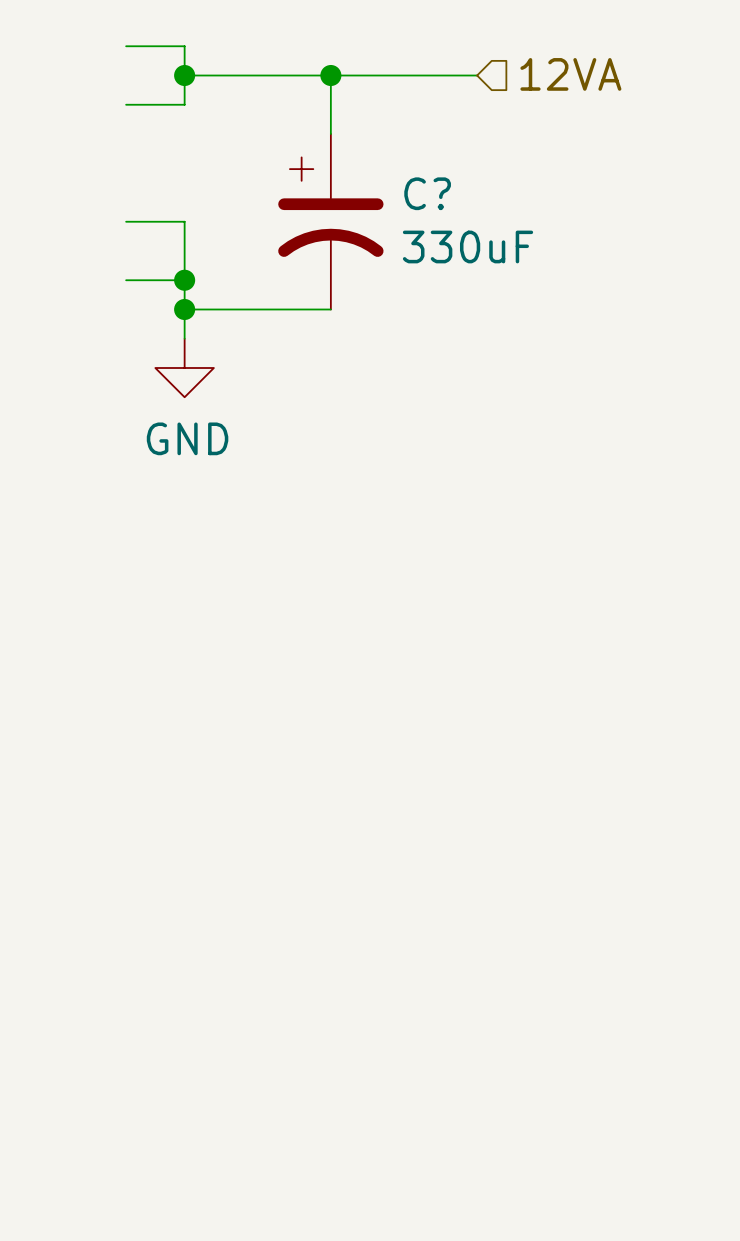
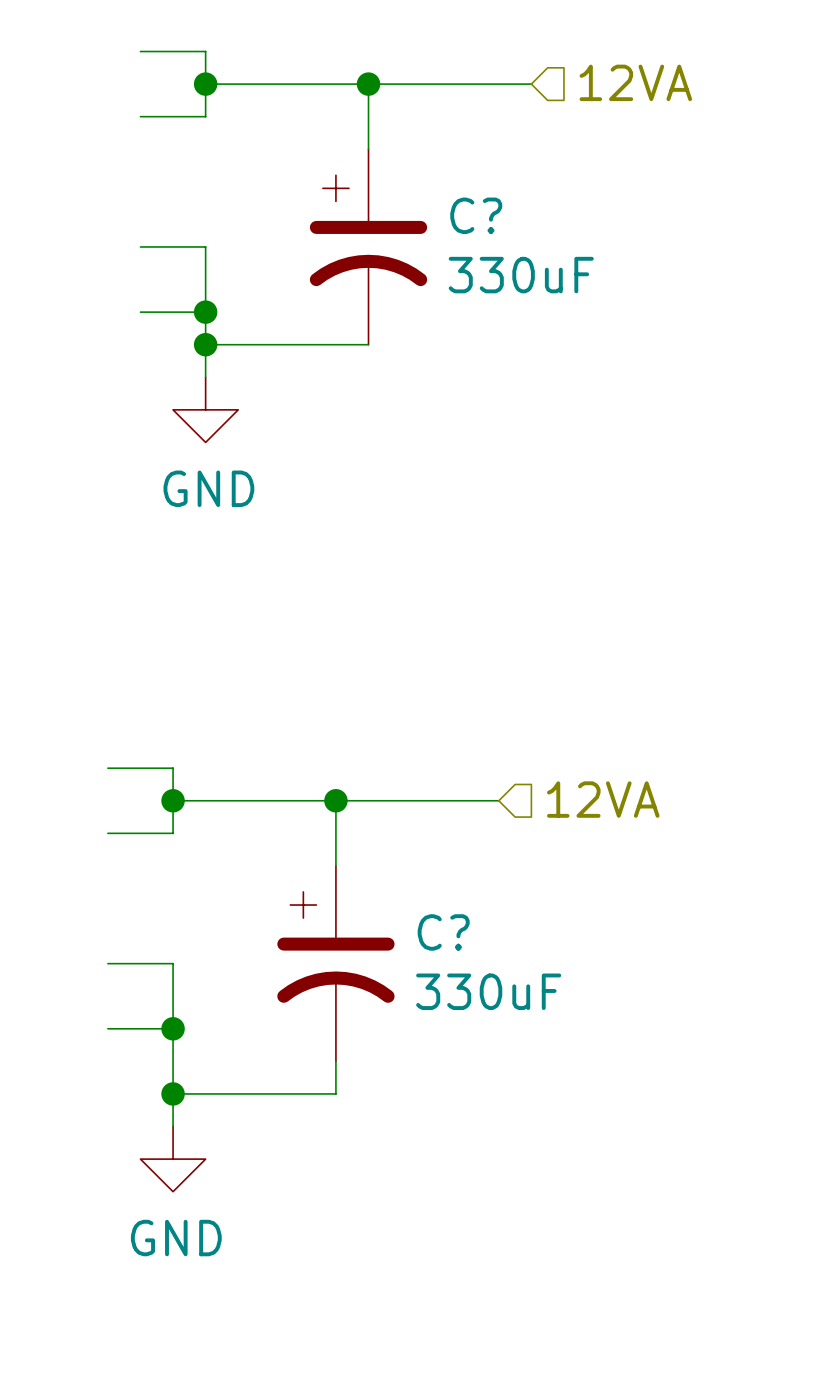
wire: none -> (107, 768) (173, 768) (173, 833) (107, 833)
hierarchical label: none -> 12VA (603, 799)
wire: none -> (173, 800) (498, 800)
junction: none -> (173, 800)
wire: none -> (335, 800) (335, 865)
junction: none -> (335, 800)
wire: none -> (107, 963) (173, 963) (173, 1126)
C?: none -> 330uF (335, 963)
wire: none -> (107, 1028) (173, 1028)
junction: none -> (173, 1028)
wire: none -> (335, 1061) (335, 1093) (173, 1093)
junction: none -> (173, 1093)
power symbol: none -> GND (173, 1159)

